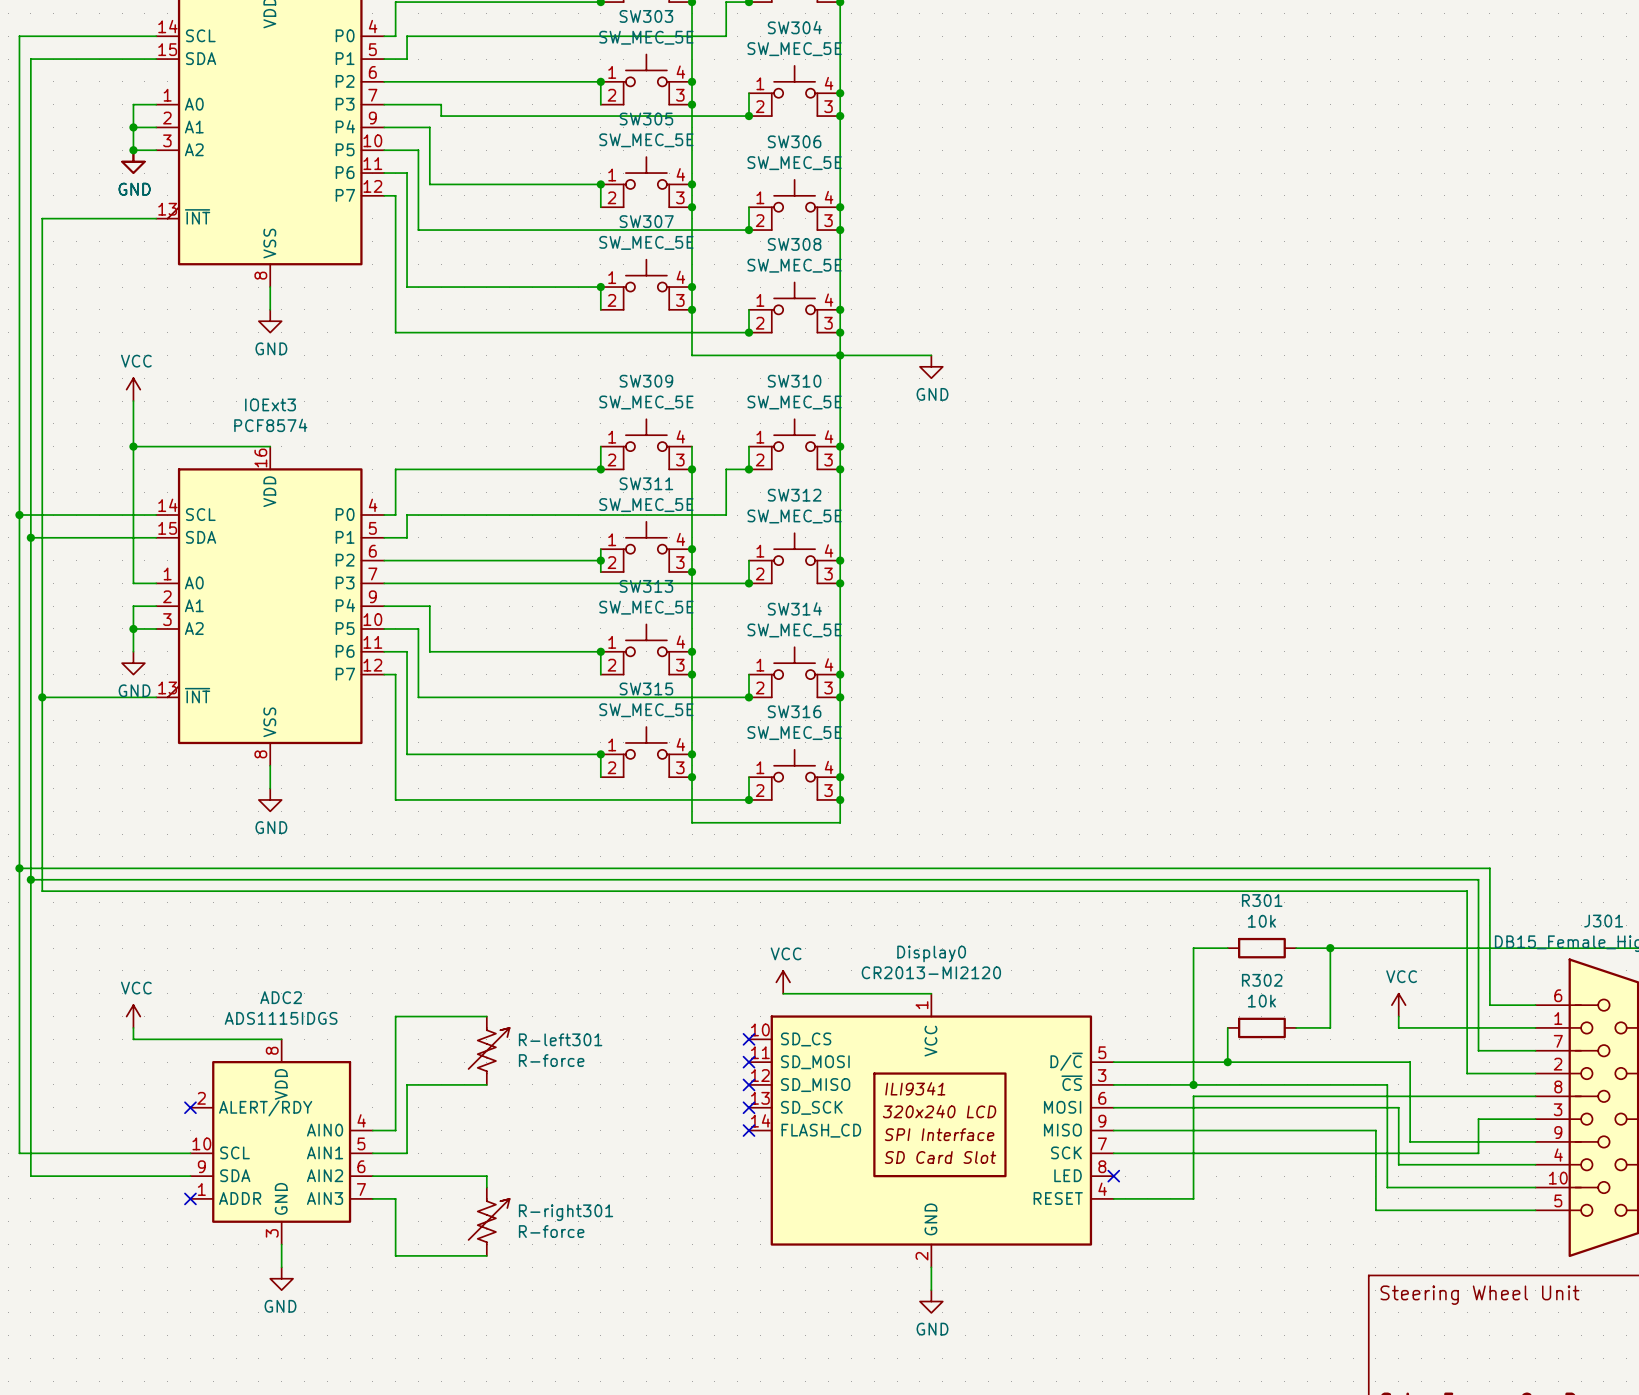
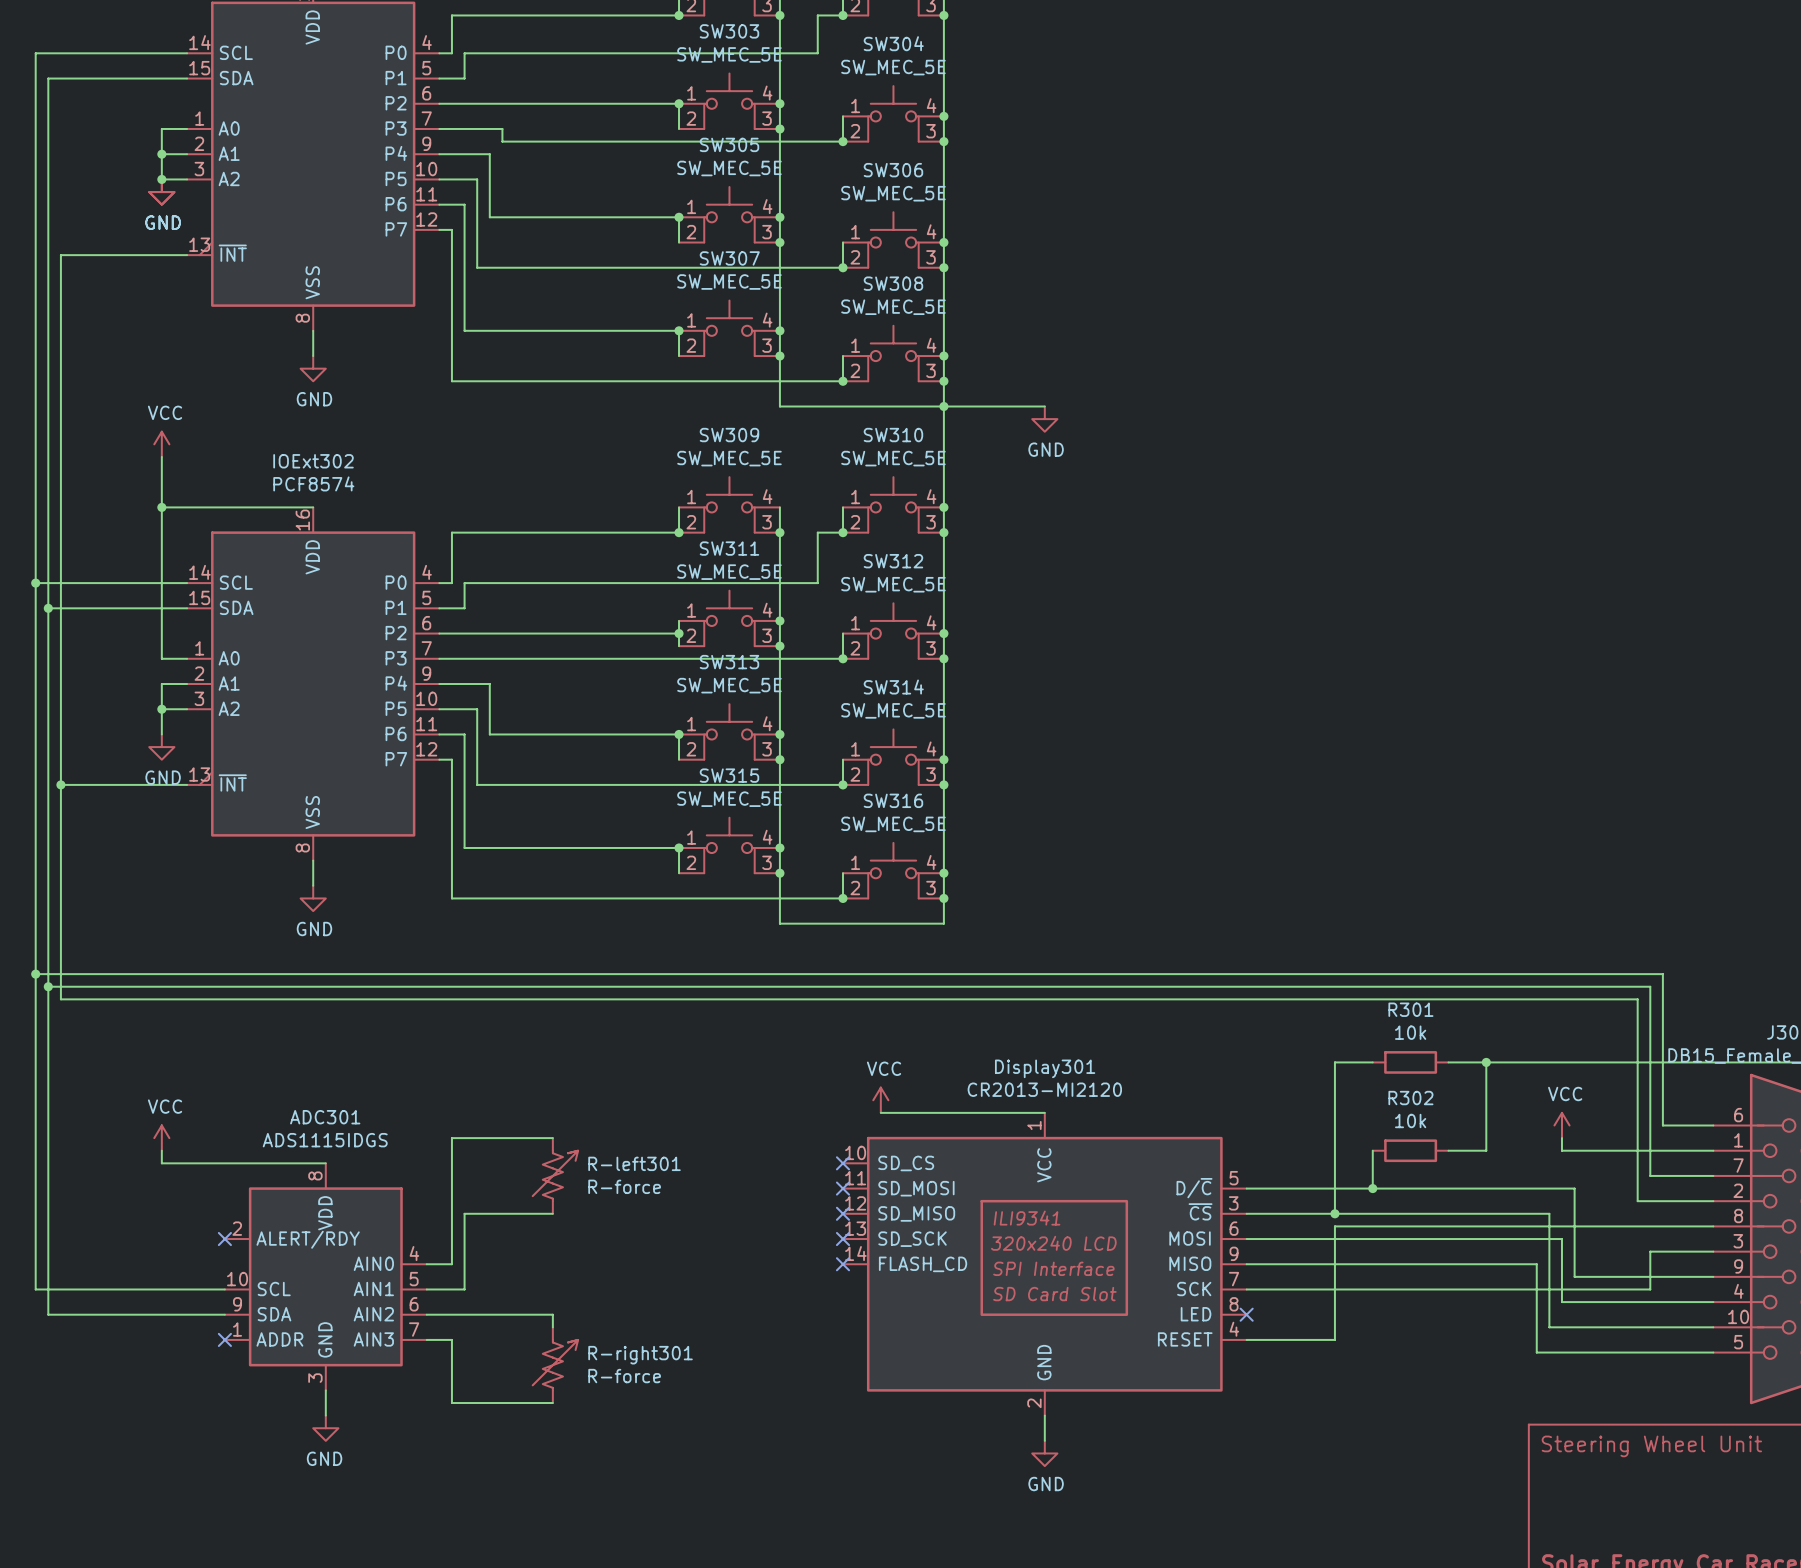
IOExt3 name: IOExt3 (270, 404) -> IOExt302 (313, 461)
Display0 name: Display0 (931, 953) -> Display301 (1045, 1068)
ADC2 name: ADC2 (281, 997) -> ADC301 (325, 1117)

